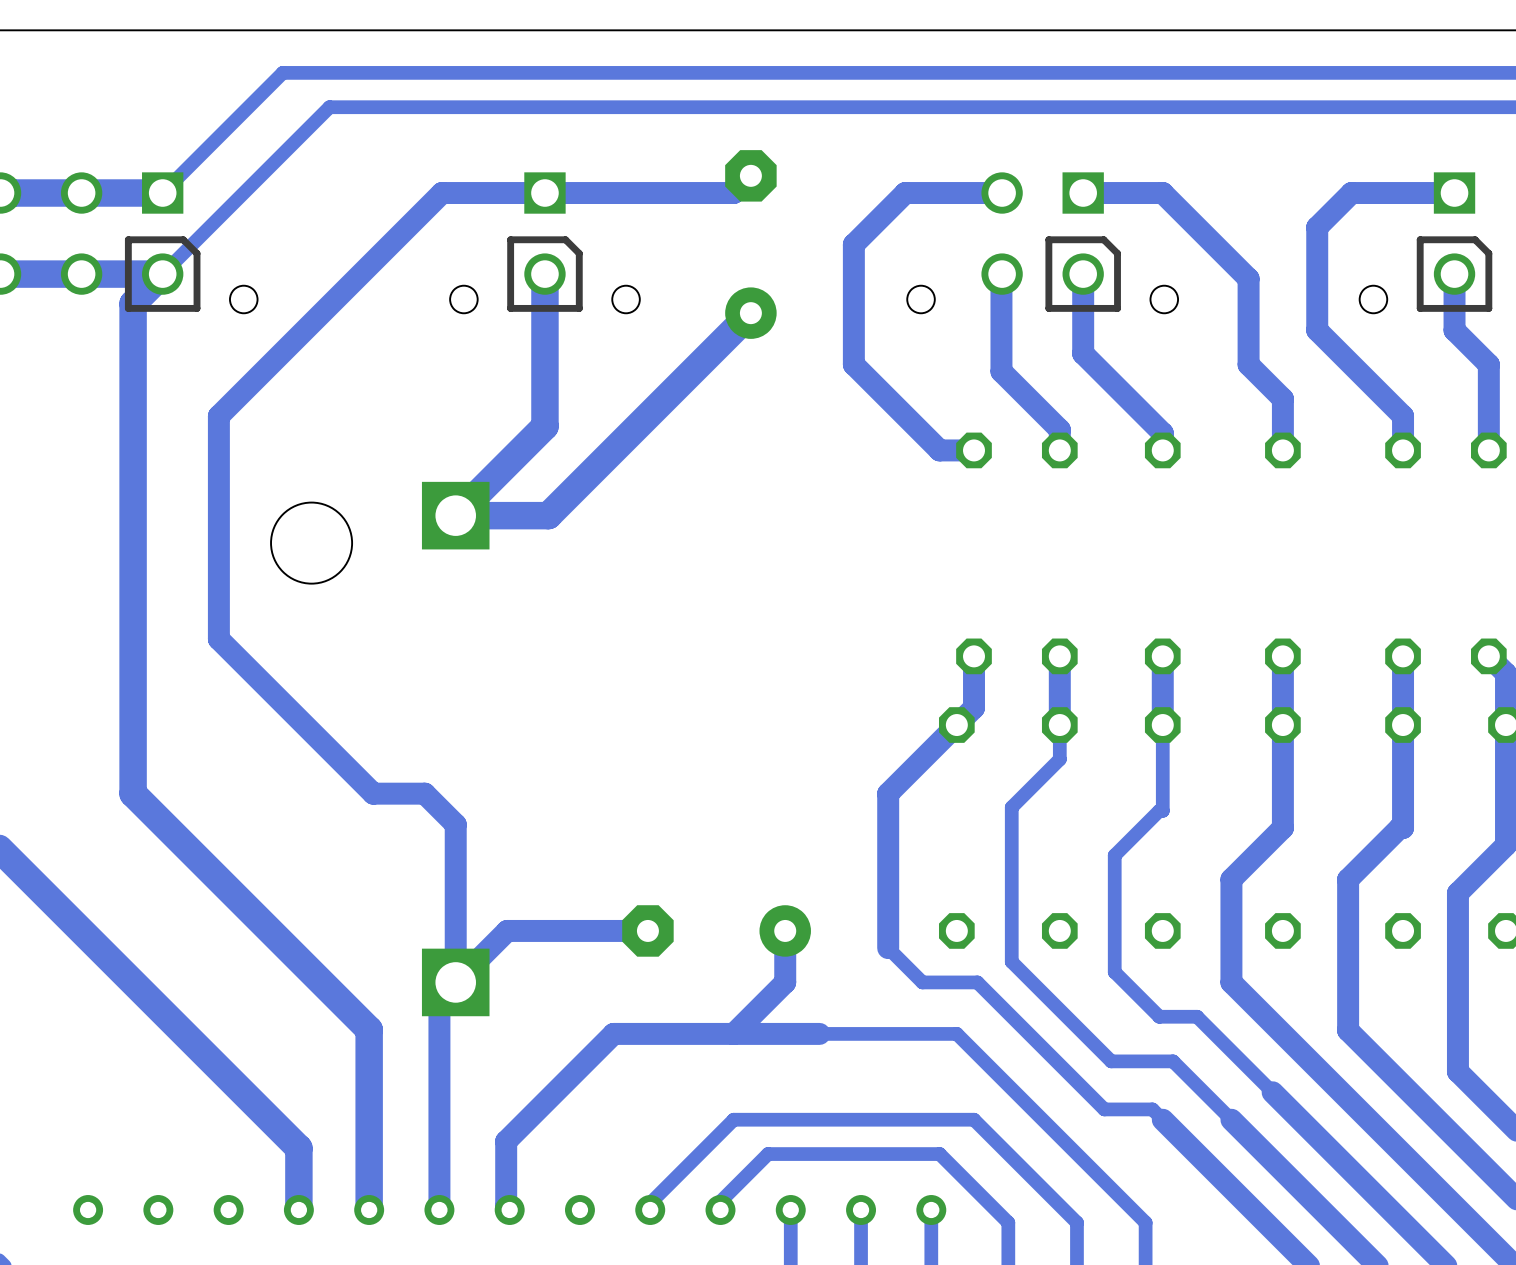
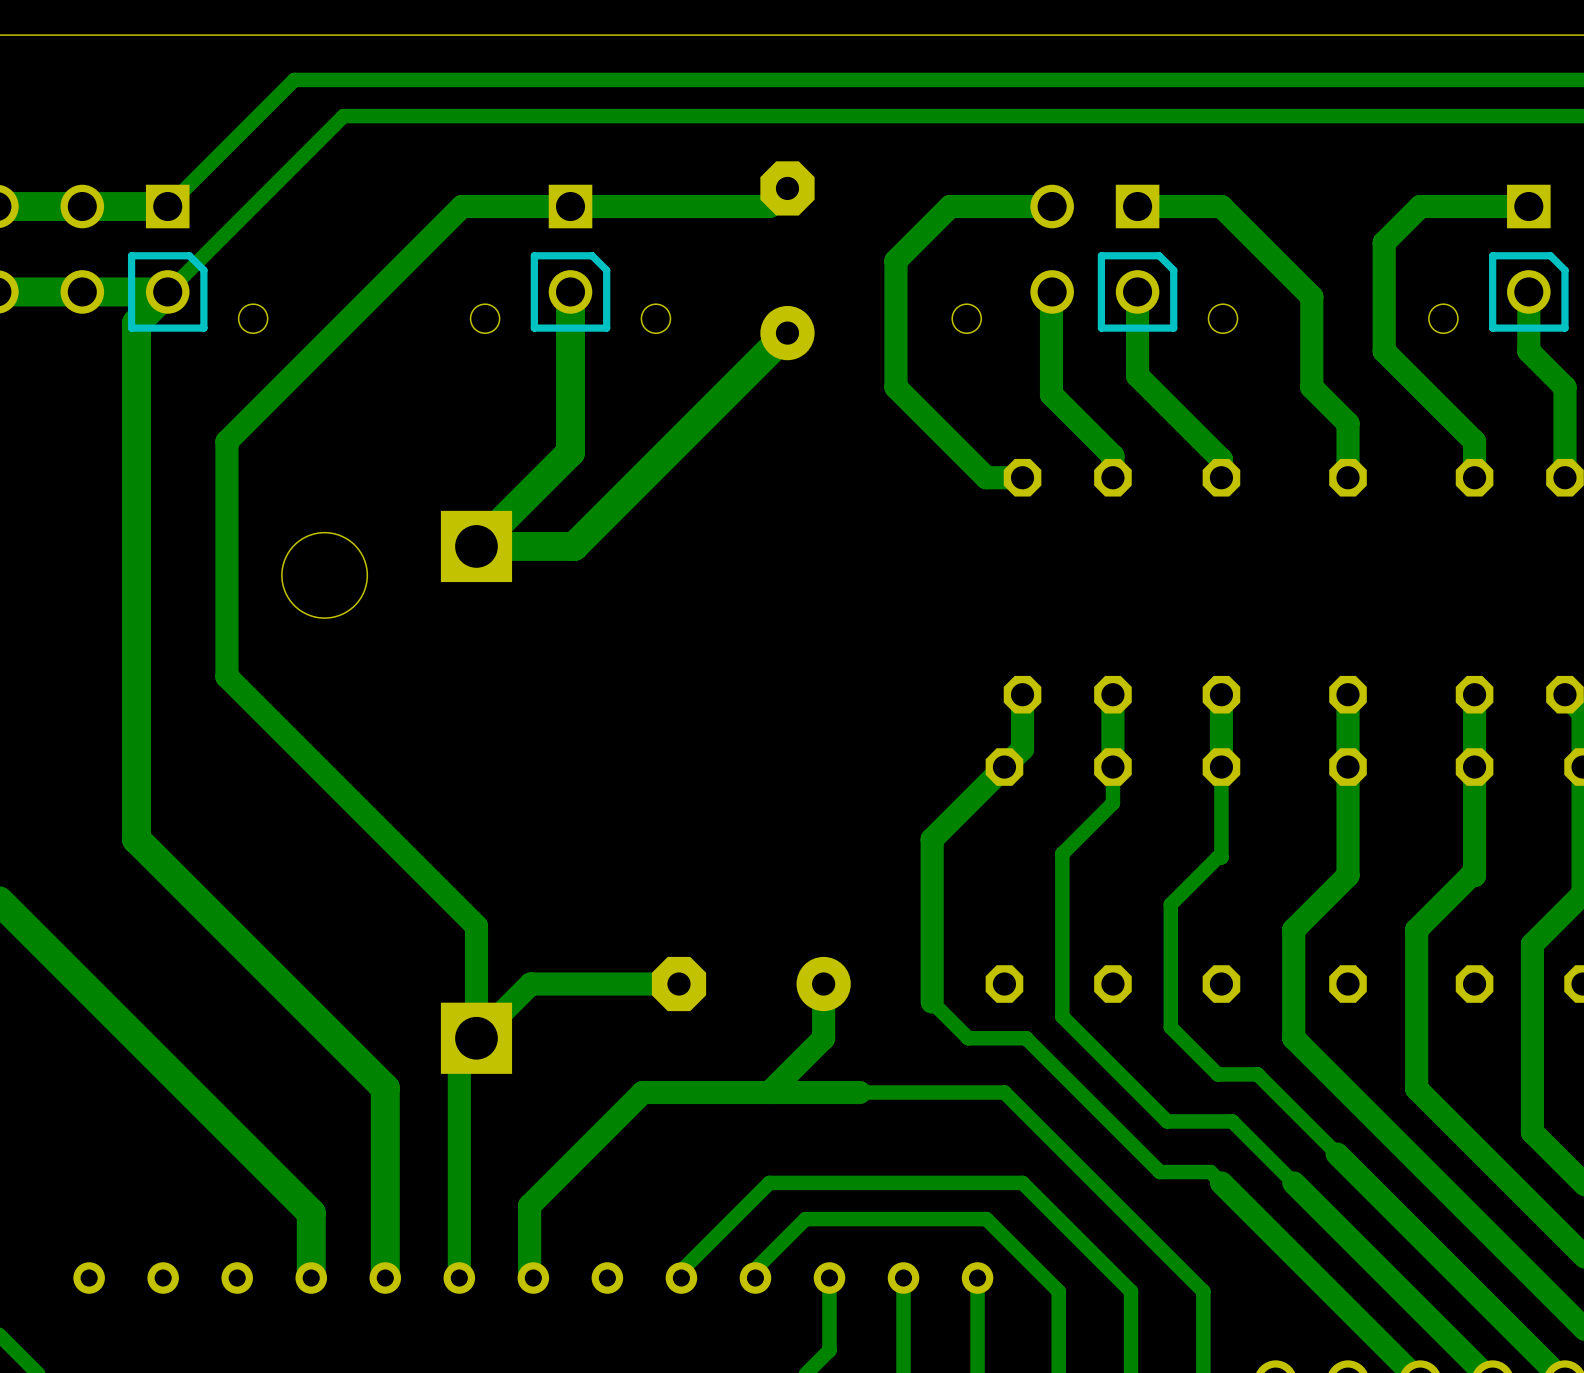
track: (373, 793) (424, 793) (455, 824) (455, 876) -> (389, 839) (476, 926)

